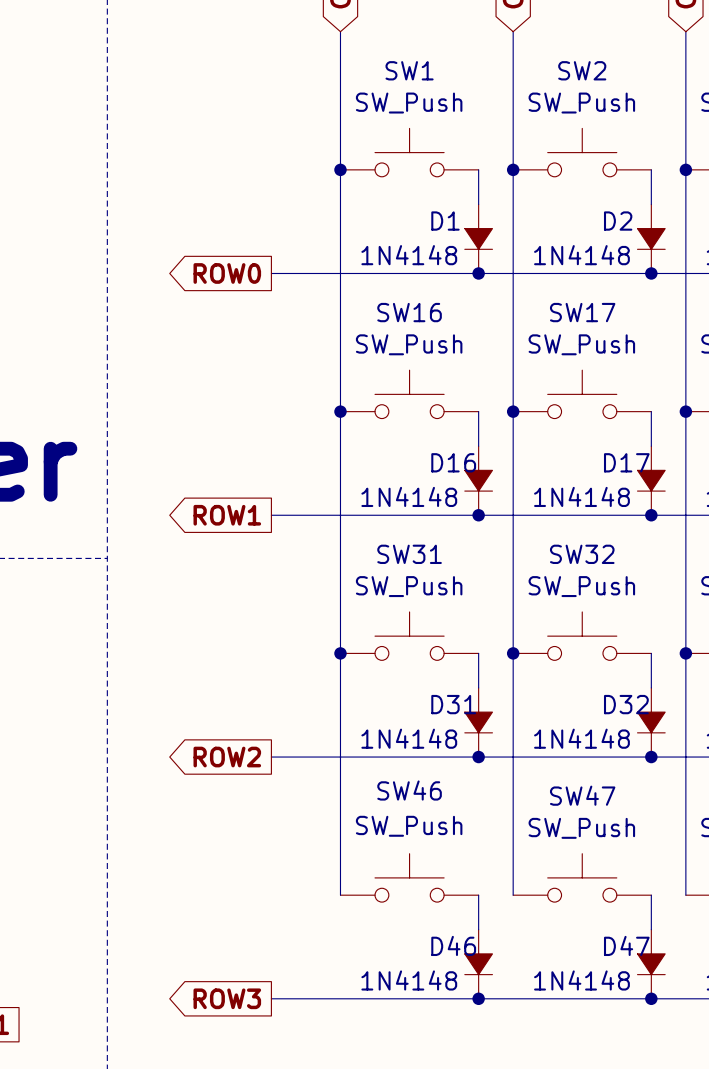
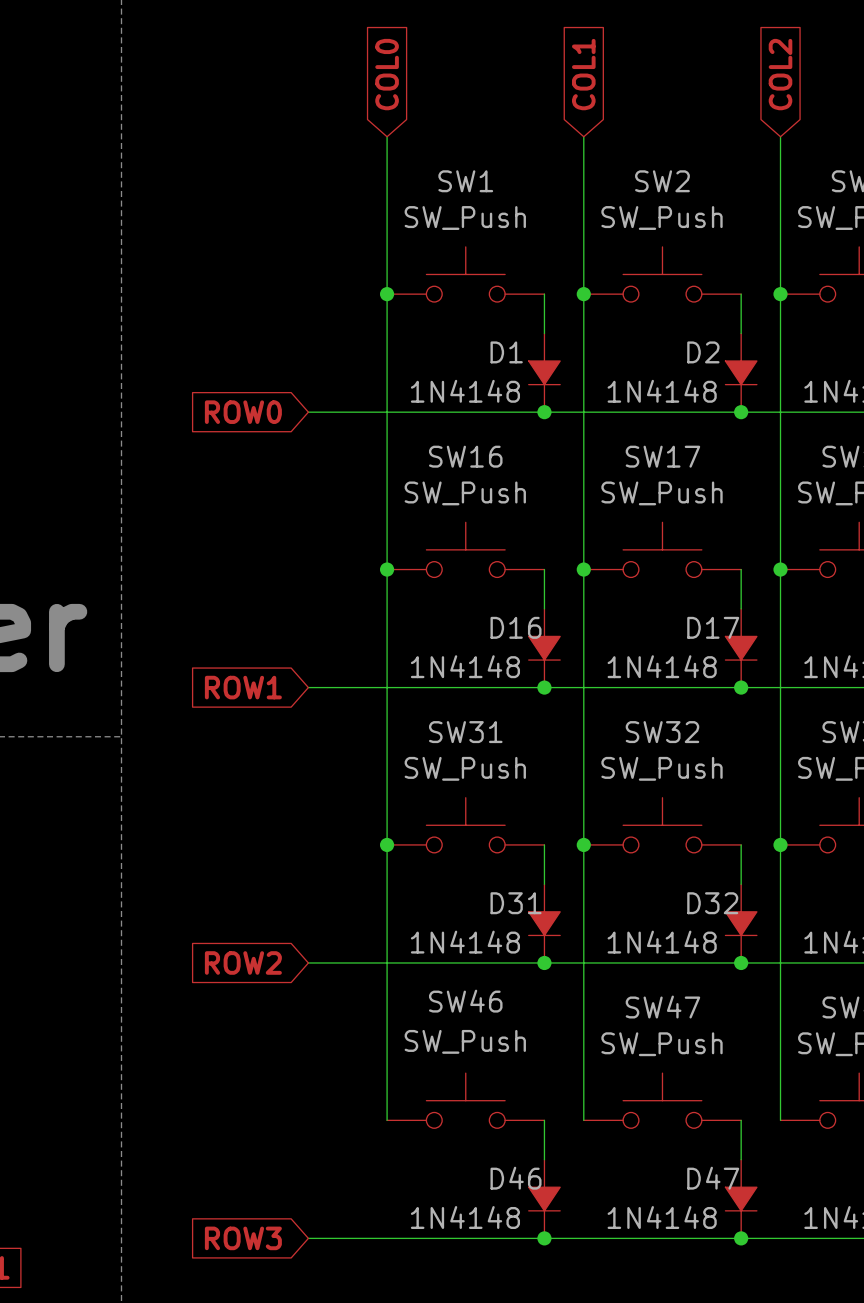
global label shape: output (227, 273) -> input (243, 412)
global label shape: output (227, 515) -> input (243, 687)
global label shape: output (227, 757) -> input (243, 962)
global label shape: output (227, 998) -> input (243, 1238)

